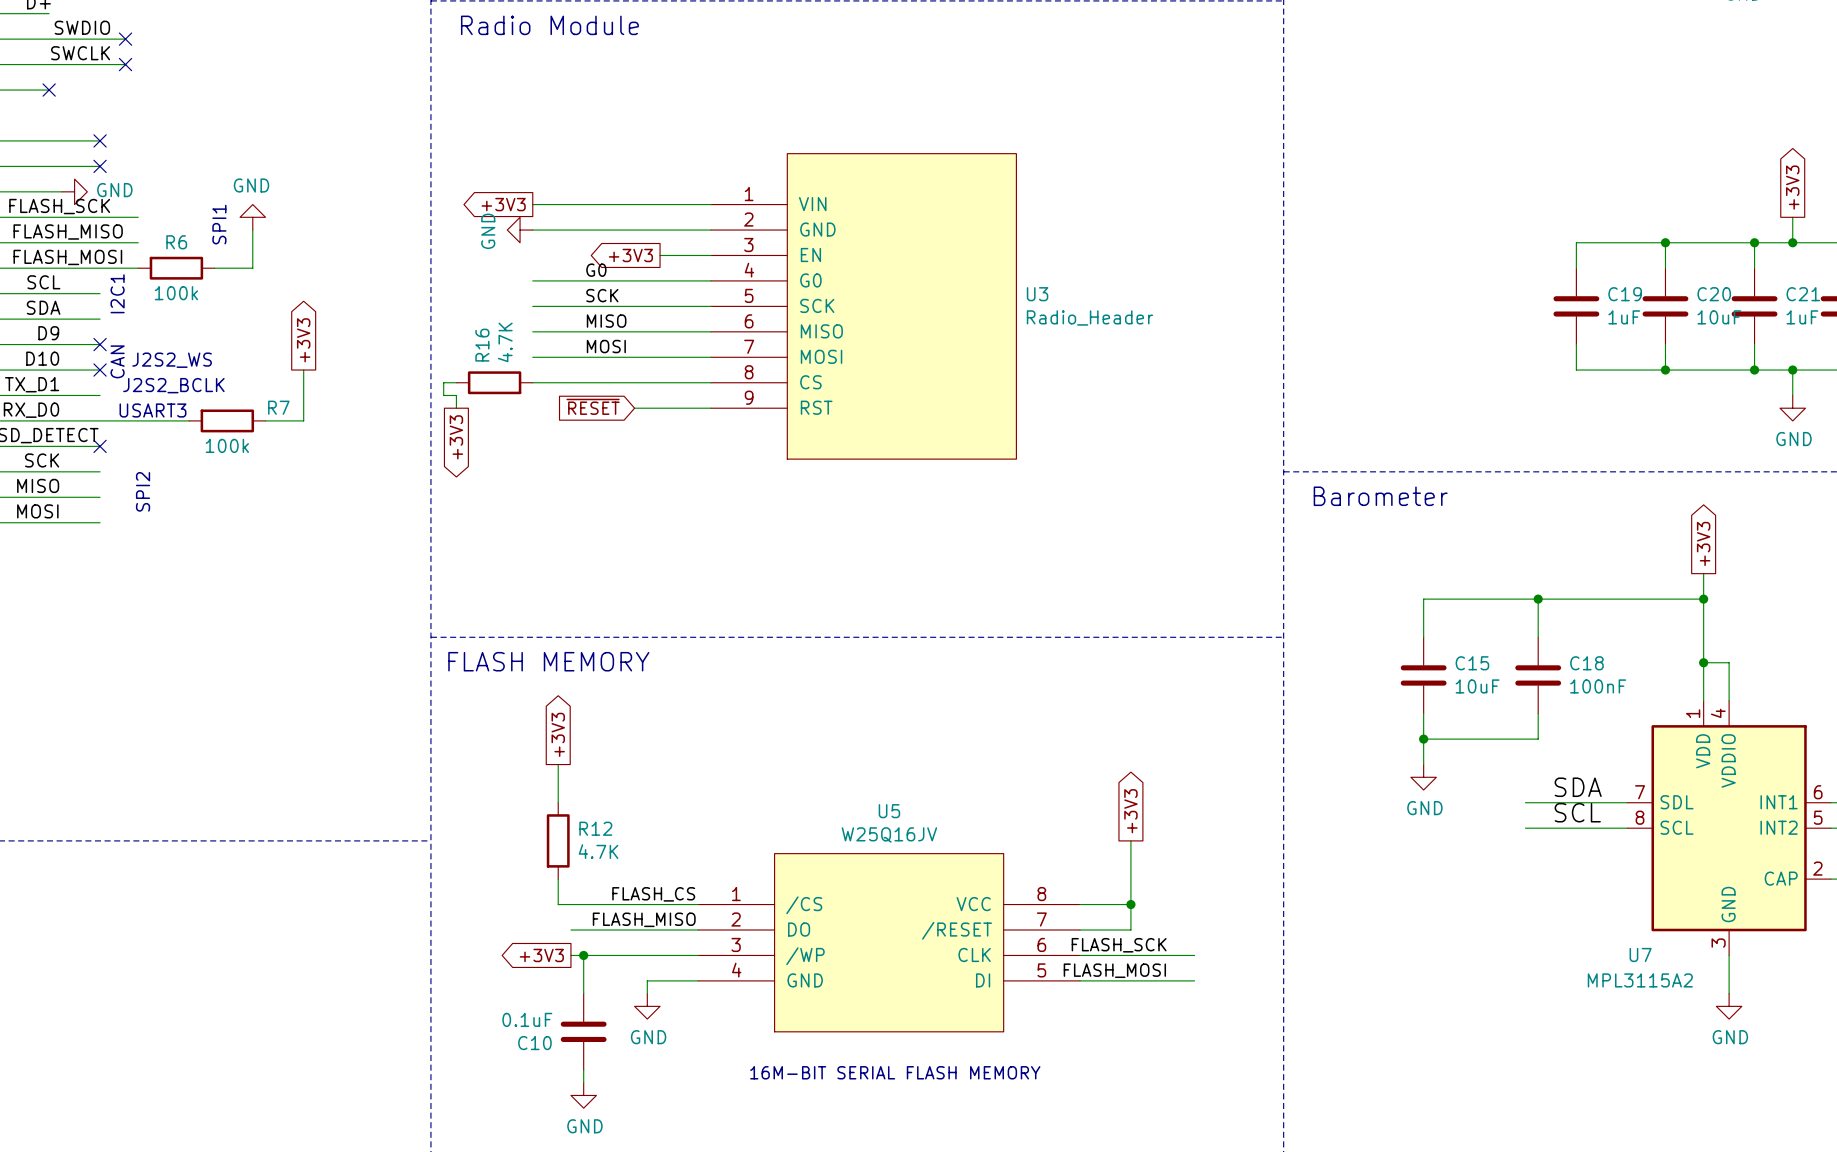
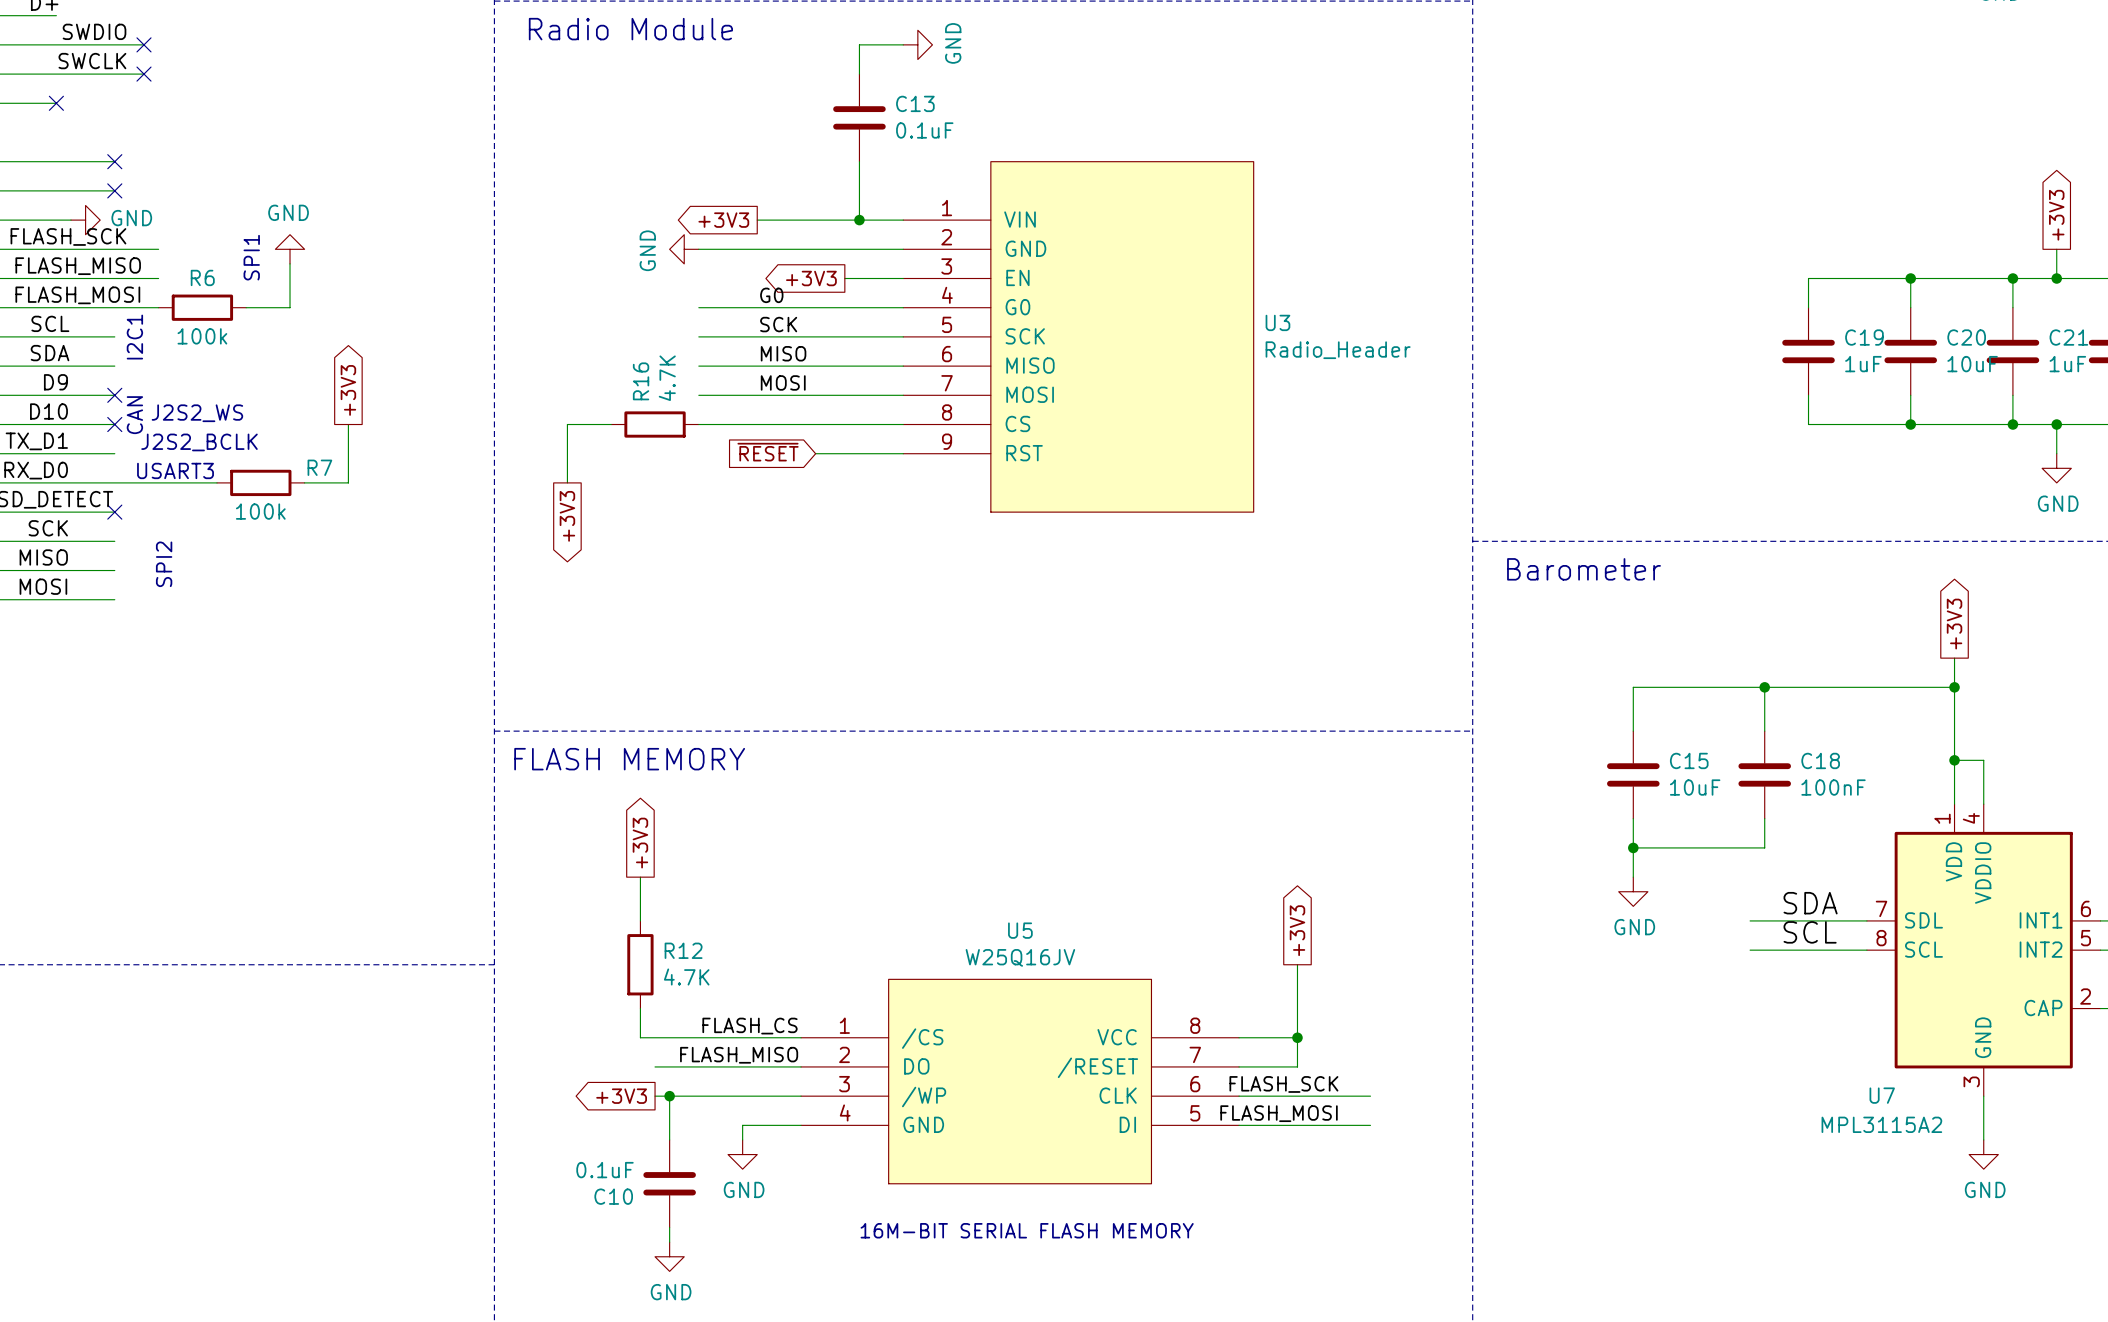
wire: none -> (903, 44) (859, 44) (859, 74)
power symbol: none -> GND (917, 44)
C13: none -> 0.1uF (859, 117)
wire: none -> (859, 161) (859, 220)
global label: none -> +3V3 (723, 220)
wire: none -> (757, 220) (903, 220)
junction: none -> (859, 220)
global label: +3V3 (503, 204) -> none
wire: (532, 204) (710, 204) -> none
power symbol position: GND (520, 230) -> GND (684, 249)
wire: (532, 230) (710, 230) -> (698, 249) (903, 249)
global label position: +3V3 (630, 255) -> +3V3 (811, 278)
wire: (660, 255) (710, 255) -> (844, 278) (903, 278)
label position: G0 (596, 270) -> G0 (771, 295)
wire: (532, 280) (710, 280) -> (698, 307) (903, 307)
label position: SCK (602, 295) -> SCK (778, 324)
wire: (532, 306) (710, 306) -> (698, 336) (903, 336)
U3 position: (863, 306) -> (1078, 336)
label position: MISO (606, 321) -> MISO (783, 353)
wire: (532, 331) (710, 331) -> (698, 366) (903, 366)
label position: MOSI (606, 346) -> MOSI (783, 382)
wire: (532, 357) (710, 357) -> (698, 395) (903, 395)
wire: none -> (611, 424) (567, 424) (567, 482)
wire: (456, 382) (443, 382) (443, 395) (456, 395) (456, 408) -> none
R16 position: (494, 382) -> (655, 424)
wire: (532, 382) (710, 382) -> (698, 424) (903, 424)
global label position: ~{RESET} (593, 406) -> ~{RESET} (768, 452)
wire: (634, 408) (710, 408) -> (815, 453) (903, 453)
global label position: +3V3 (456, 437) -> +3V3 (567, 516)

